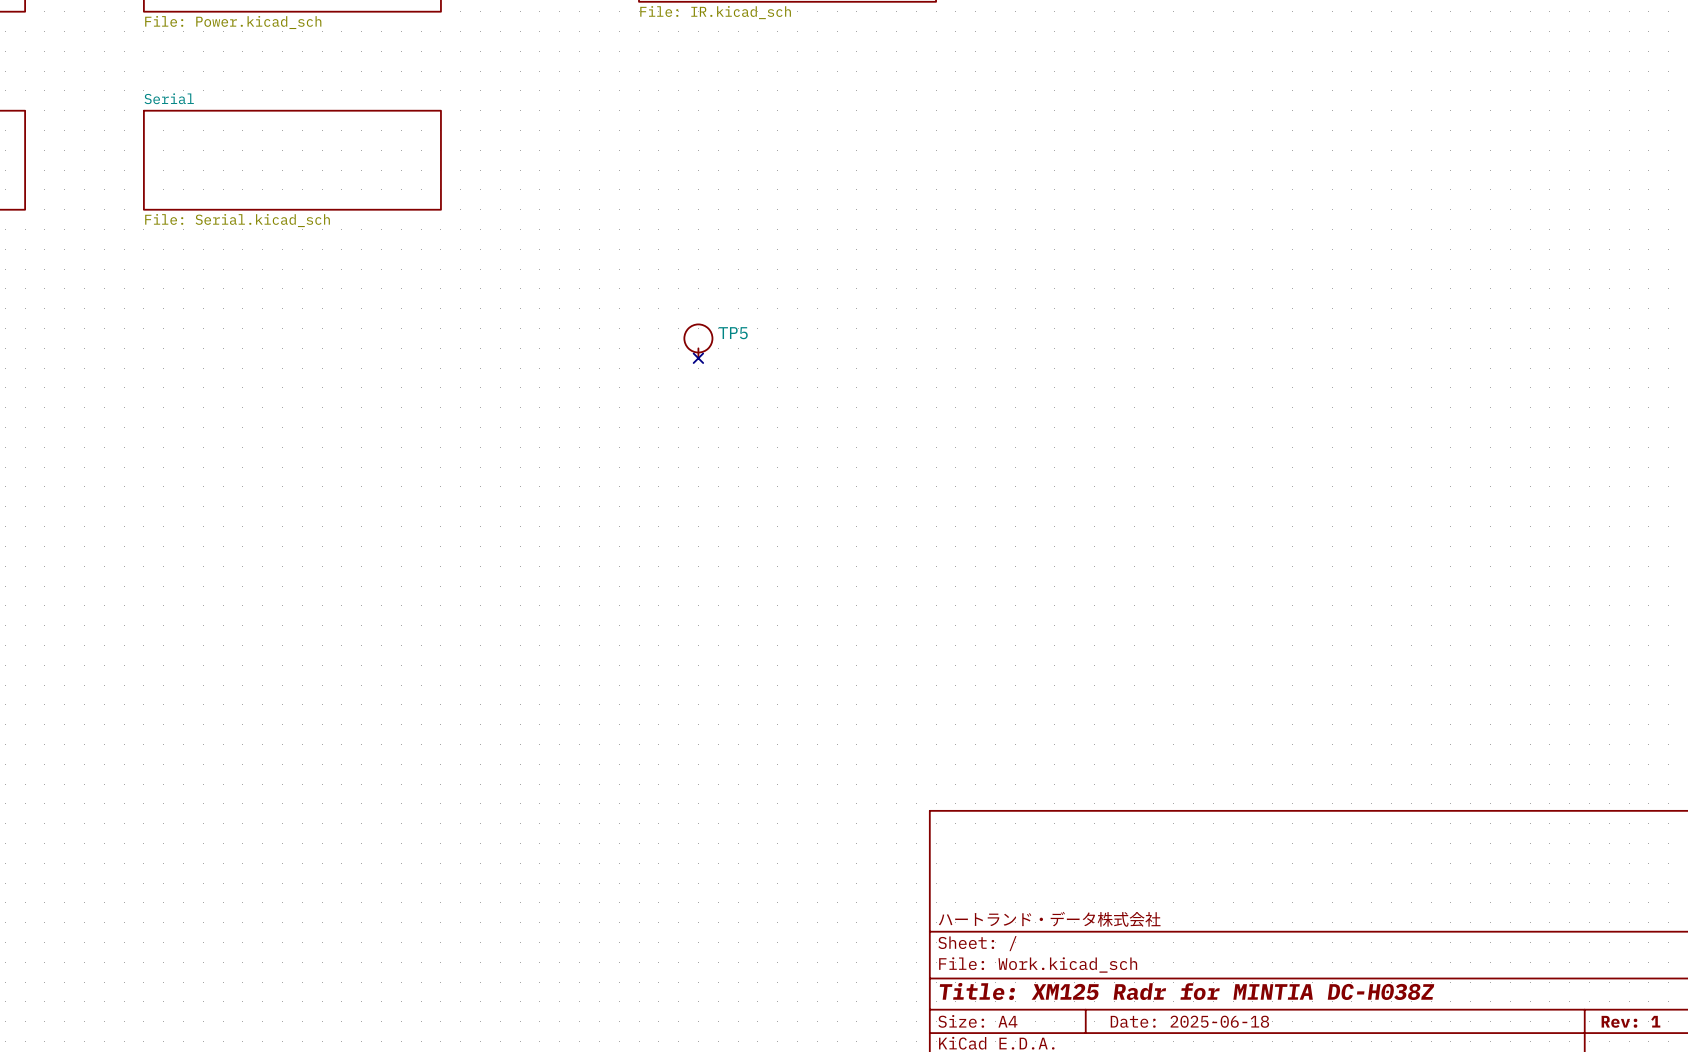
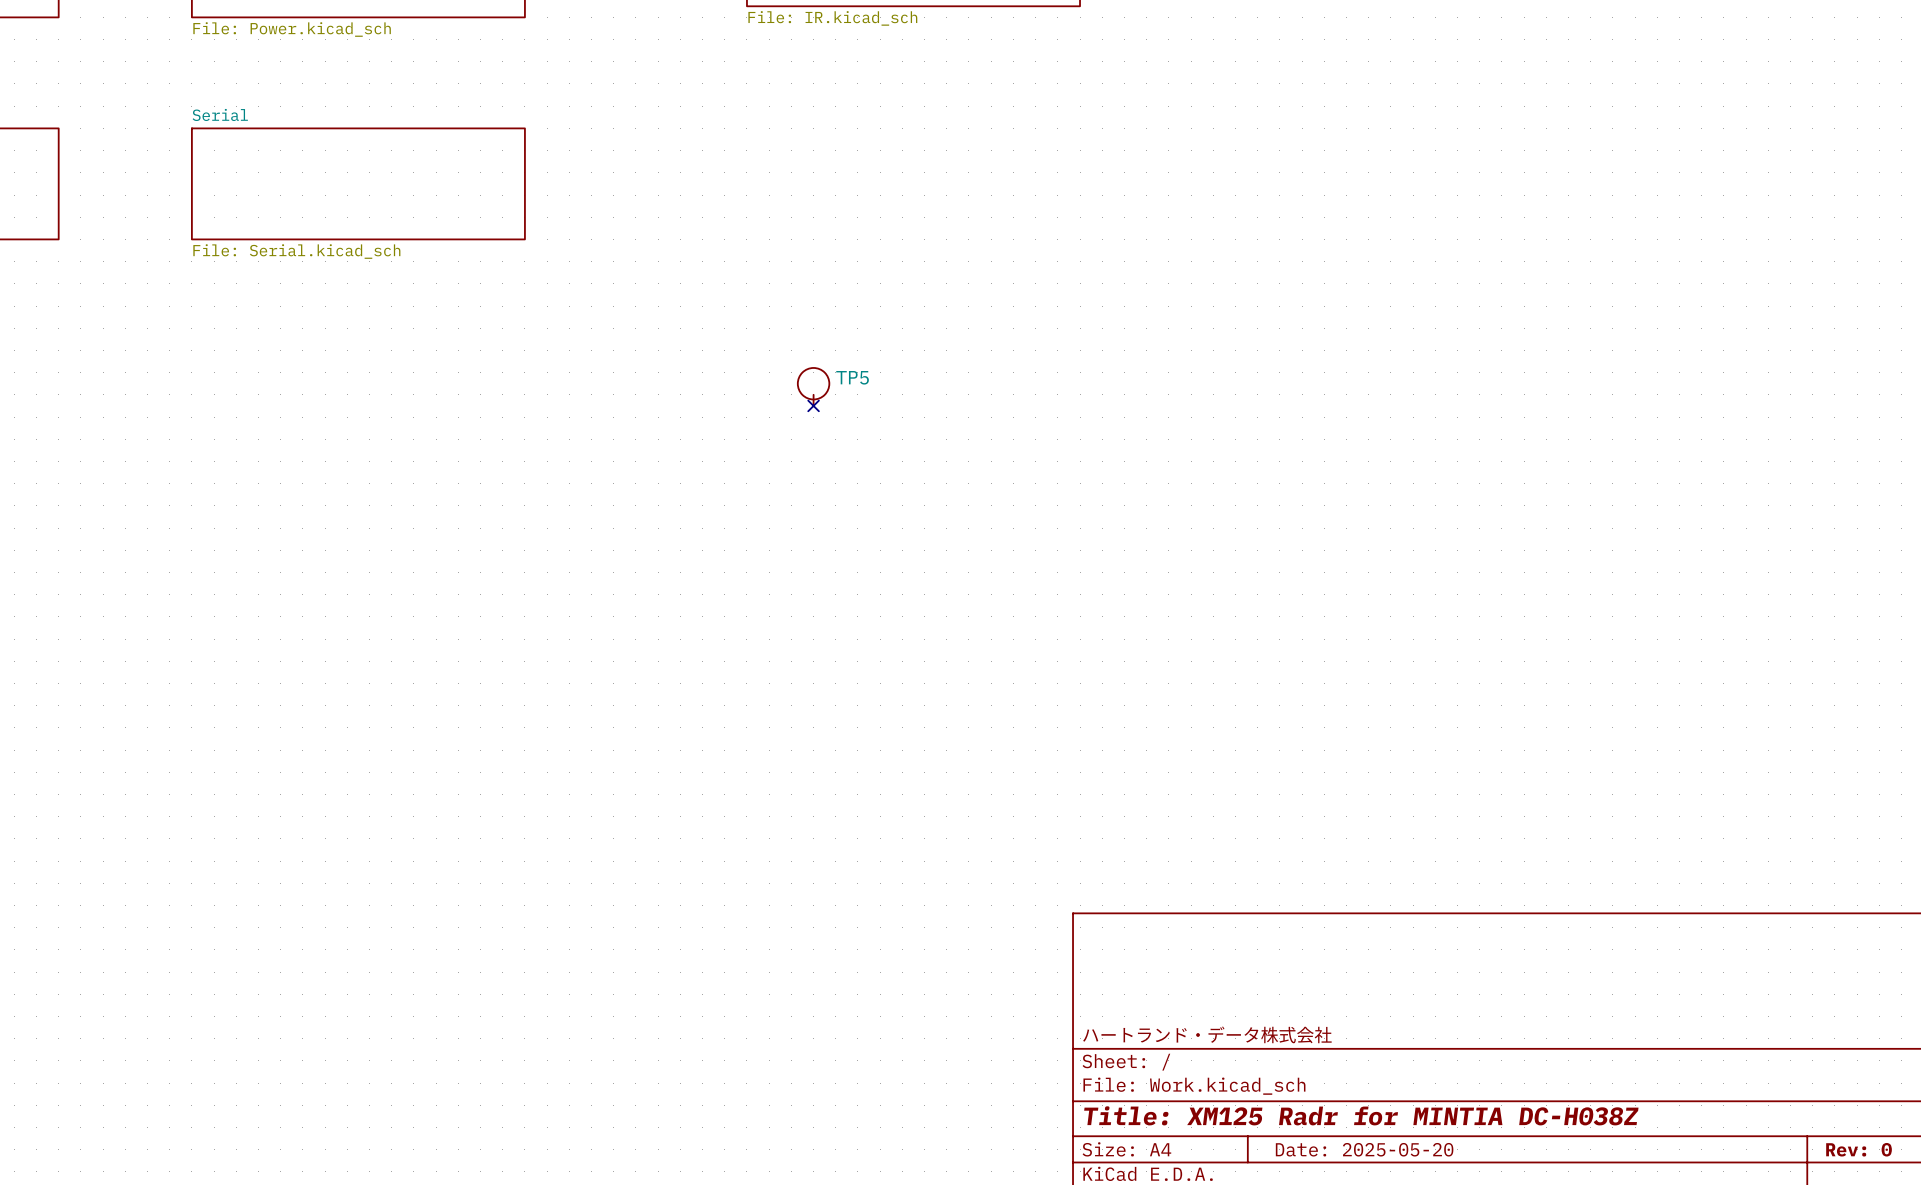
title block: Date: 2025-06-18 (1189, 1021) -> Date: 2025-05-20 (1364, 1149)
title block: Rev: 1 (1630, 1021) -> Rev: 0 (1859, 1149)

